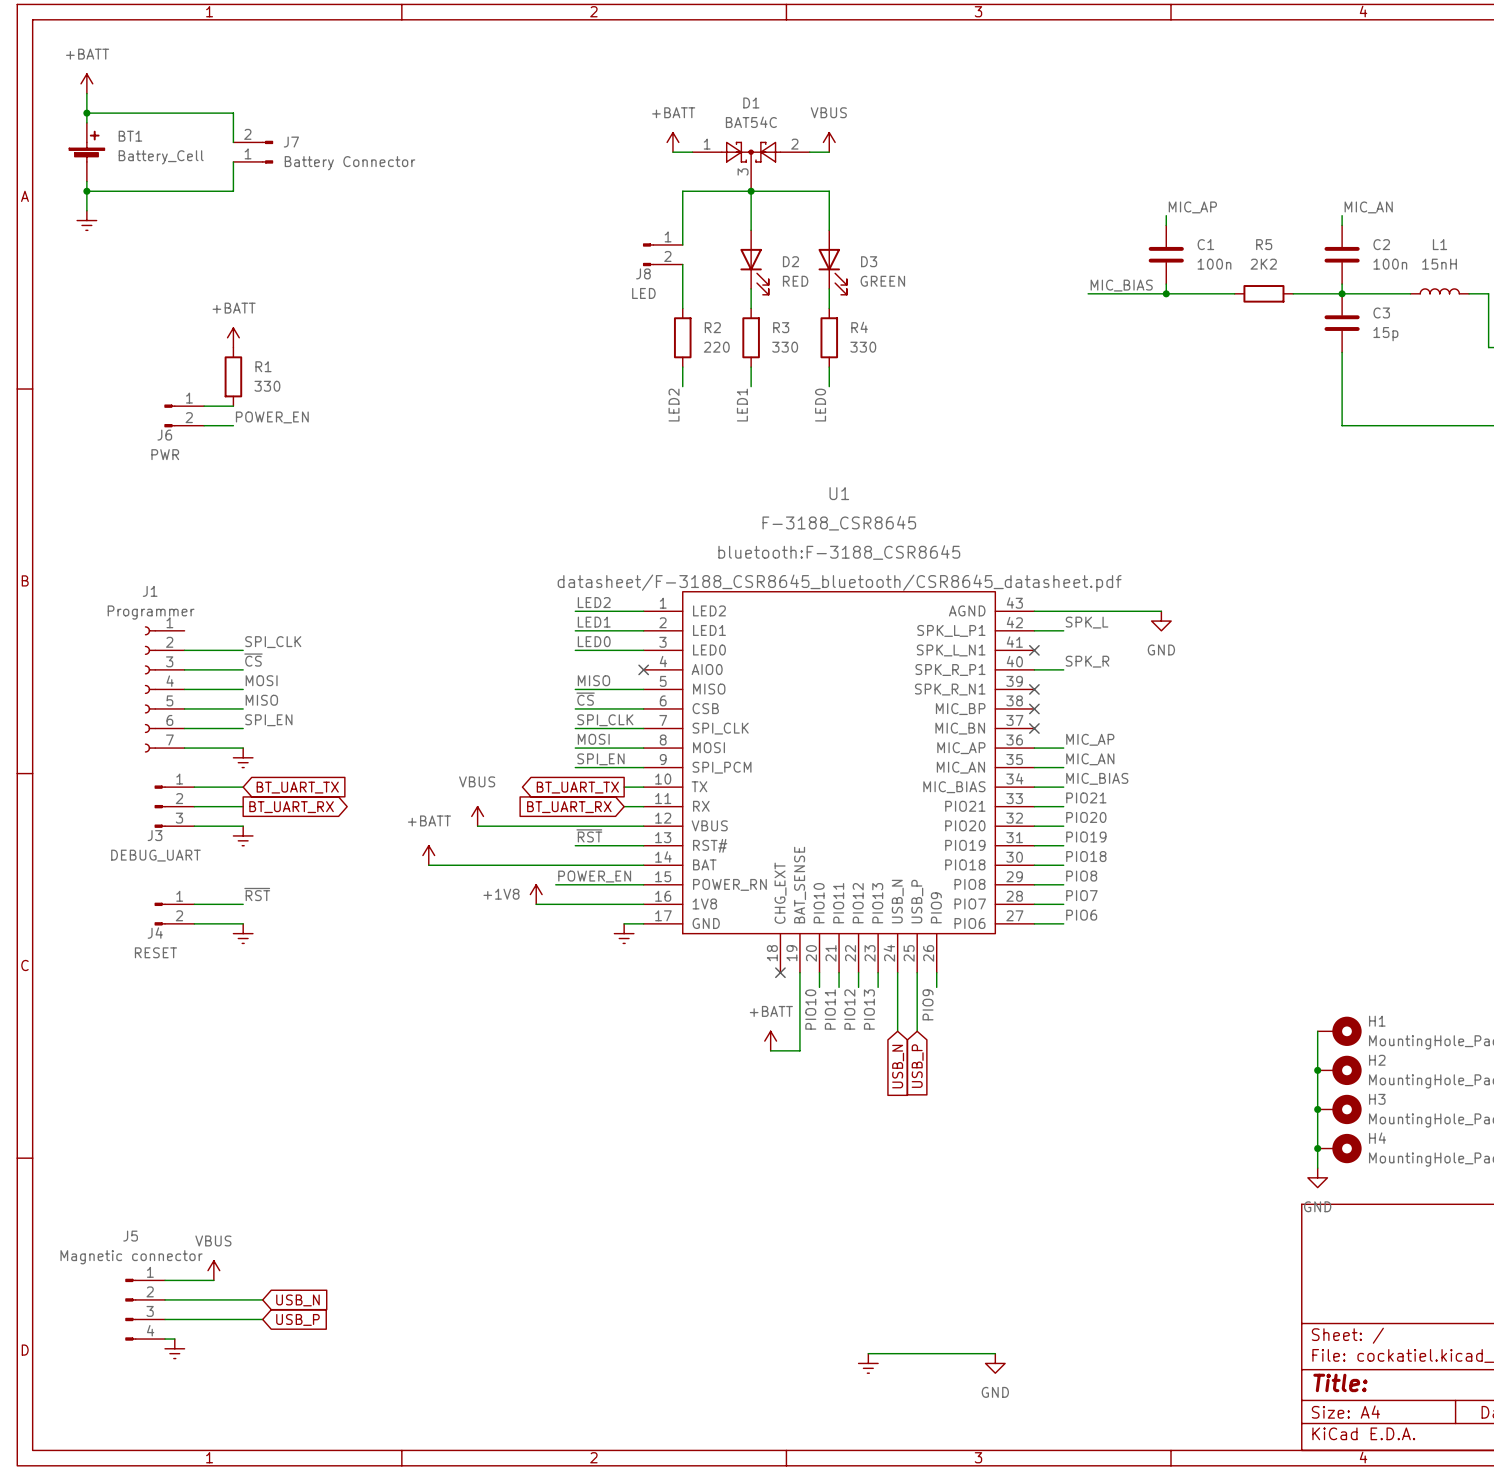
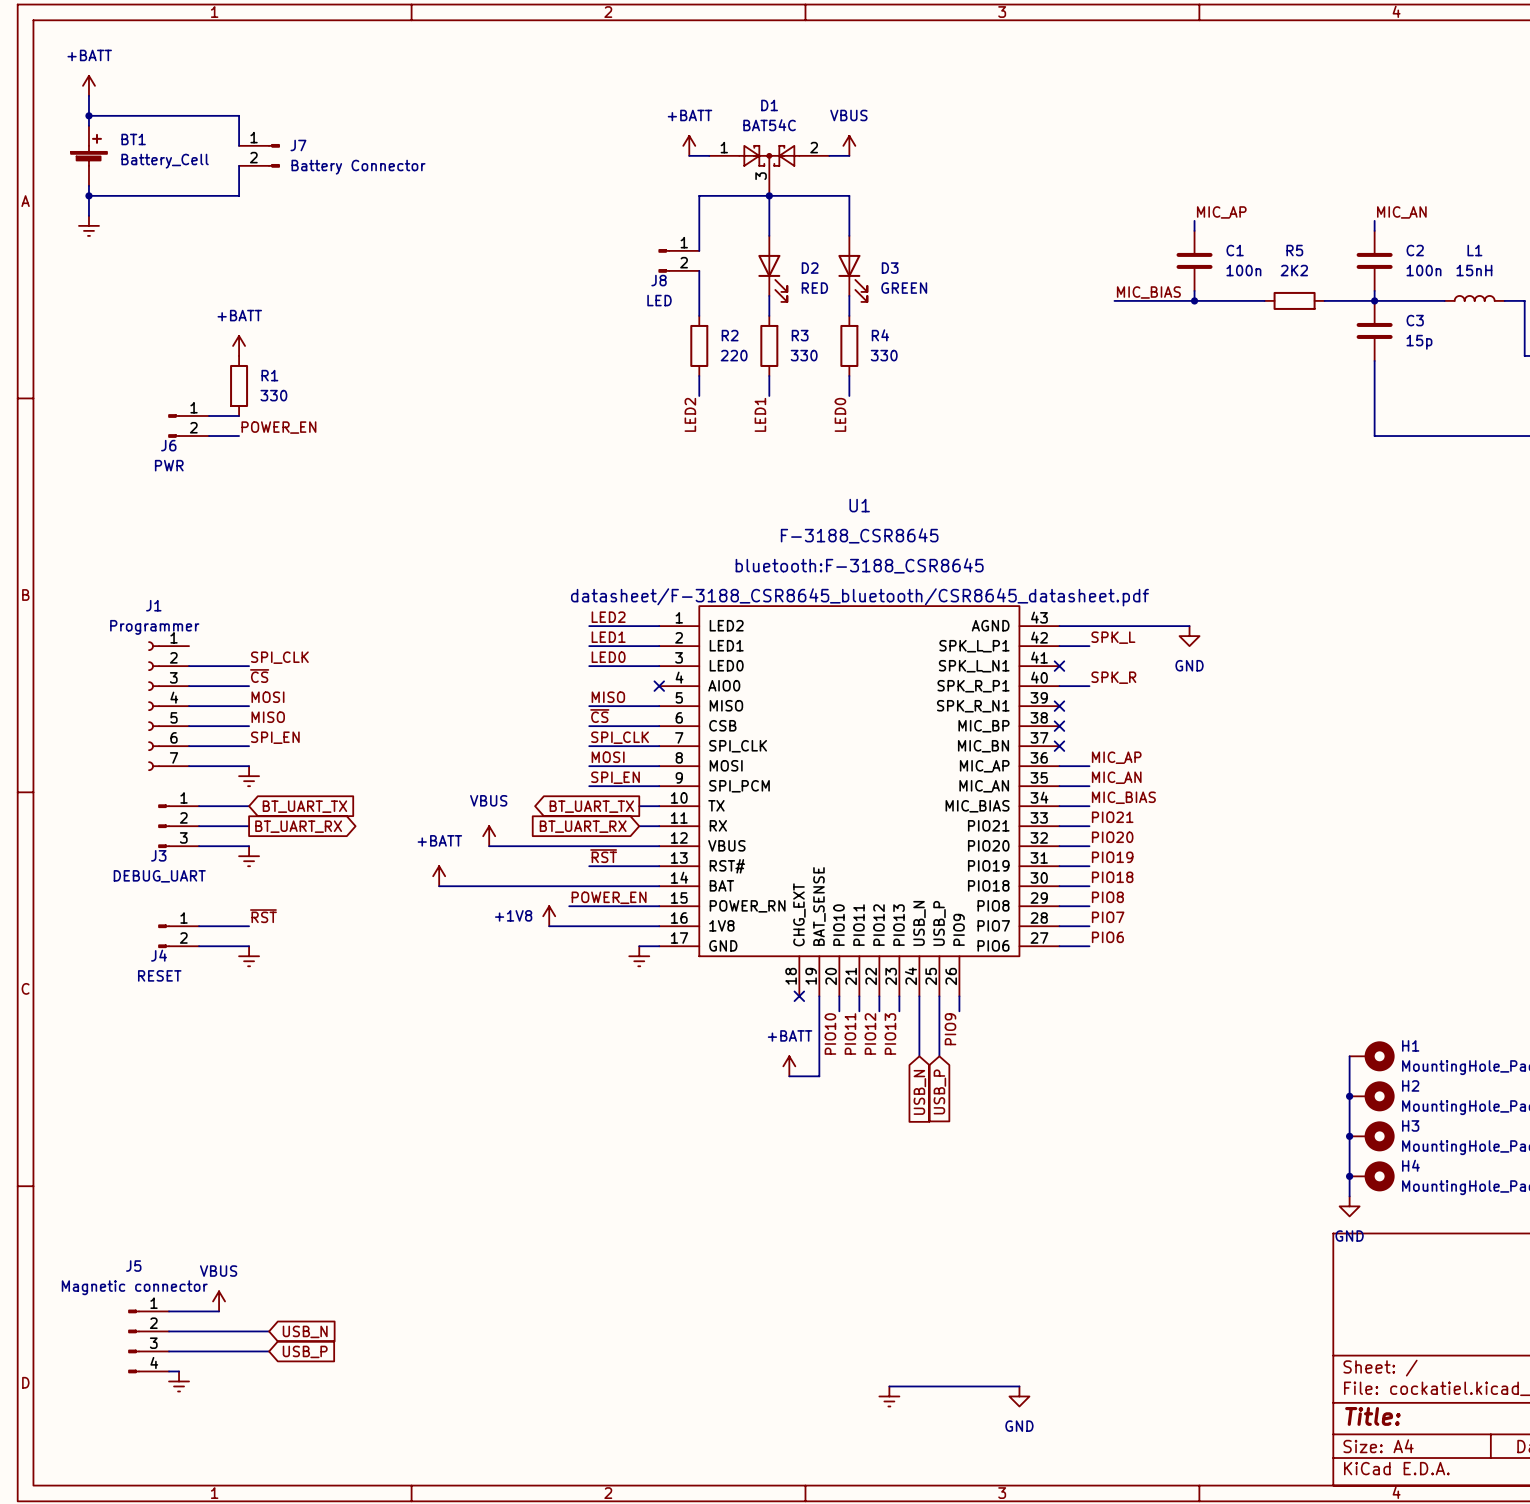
J7 flip: as is (267, 152) -> up-down (274, 155)

